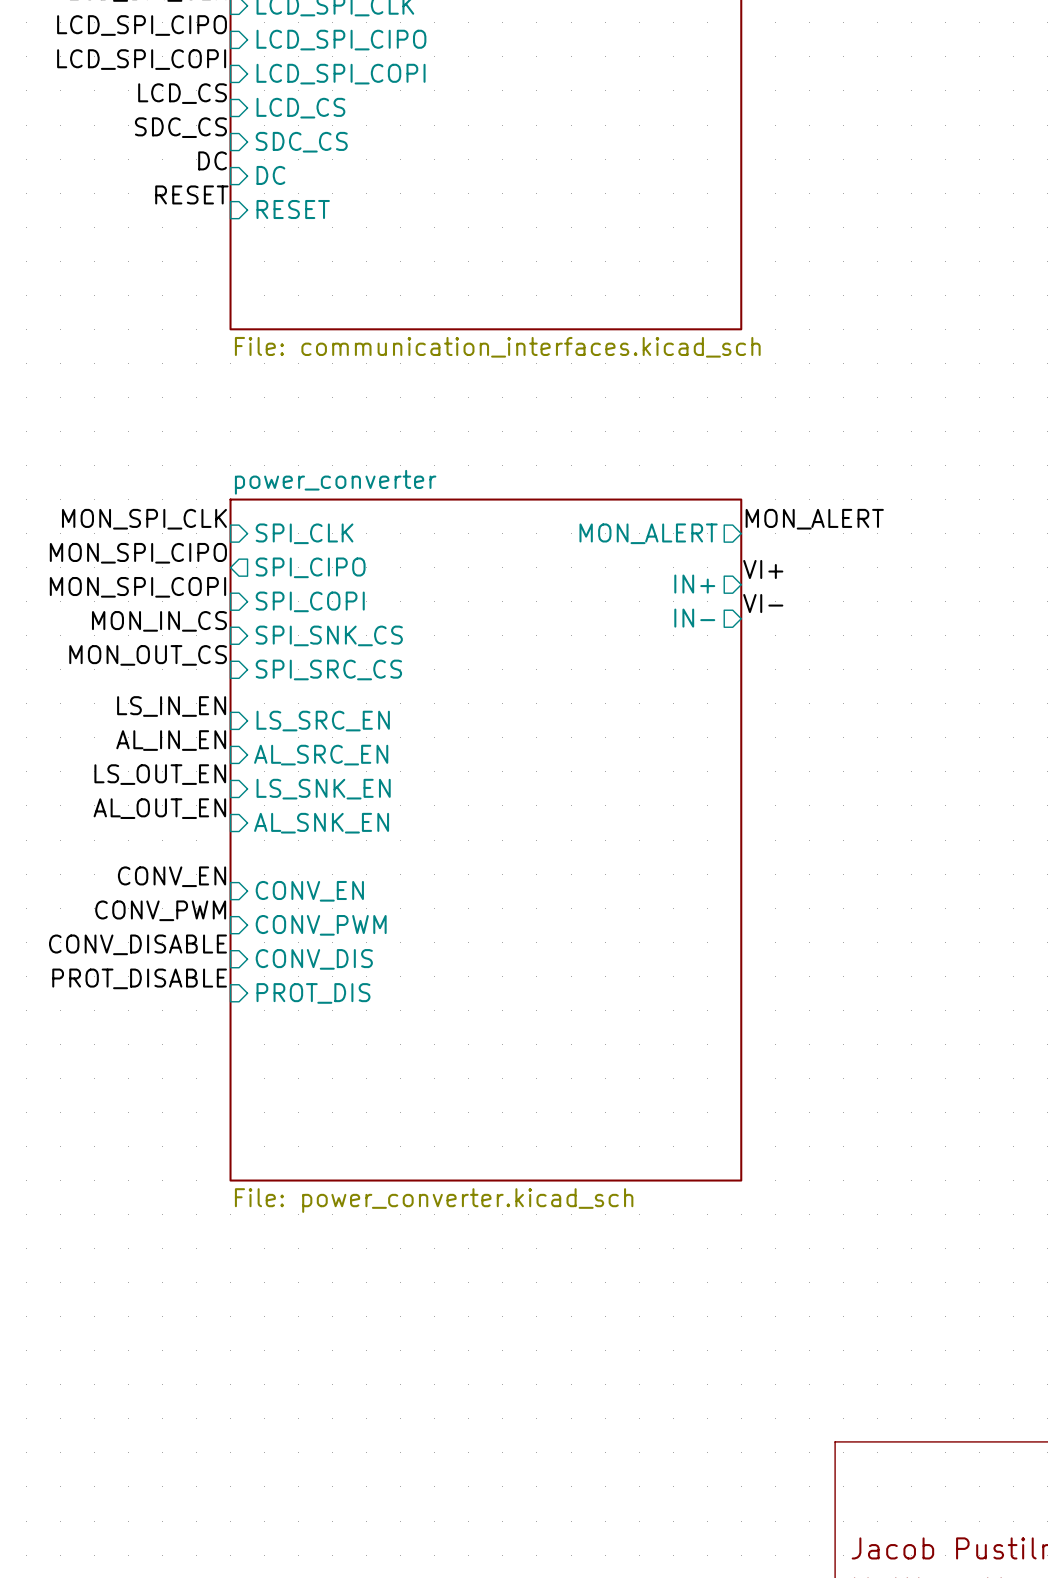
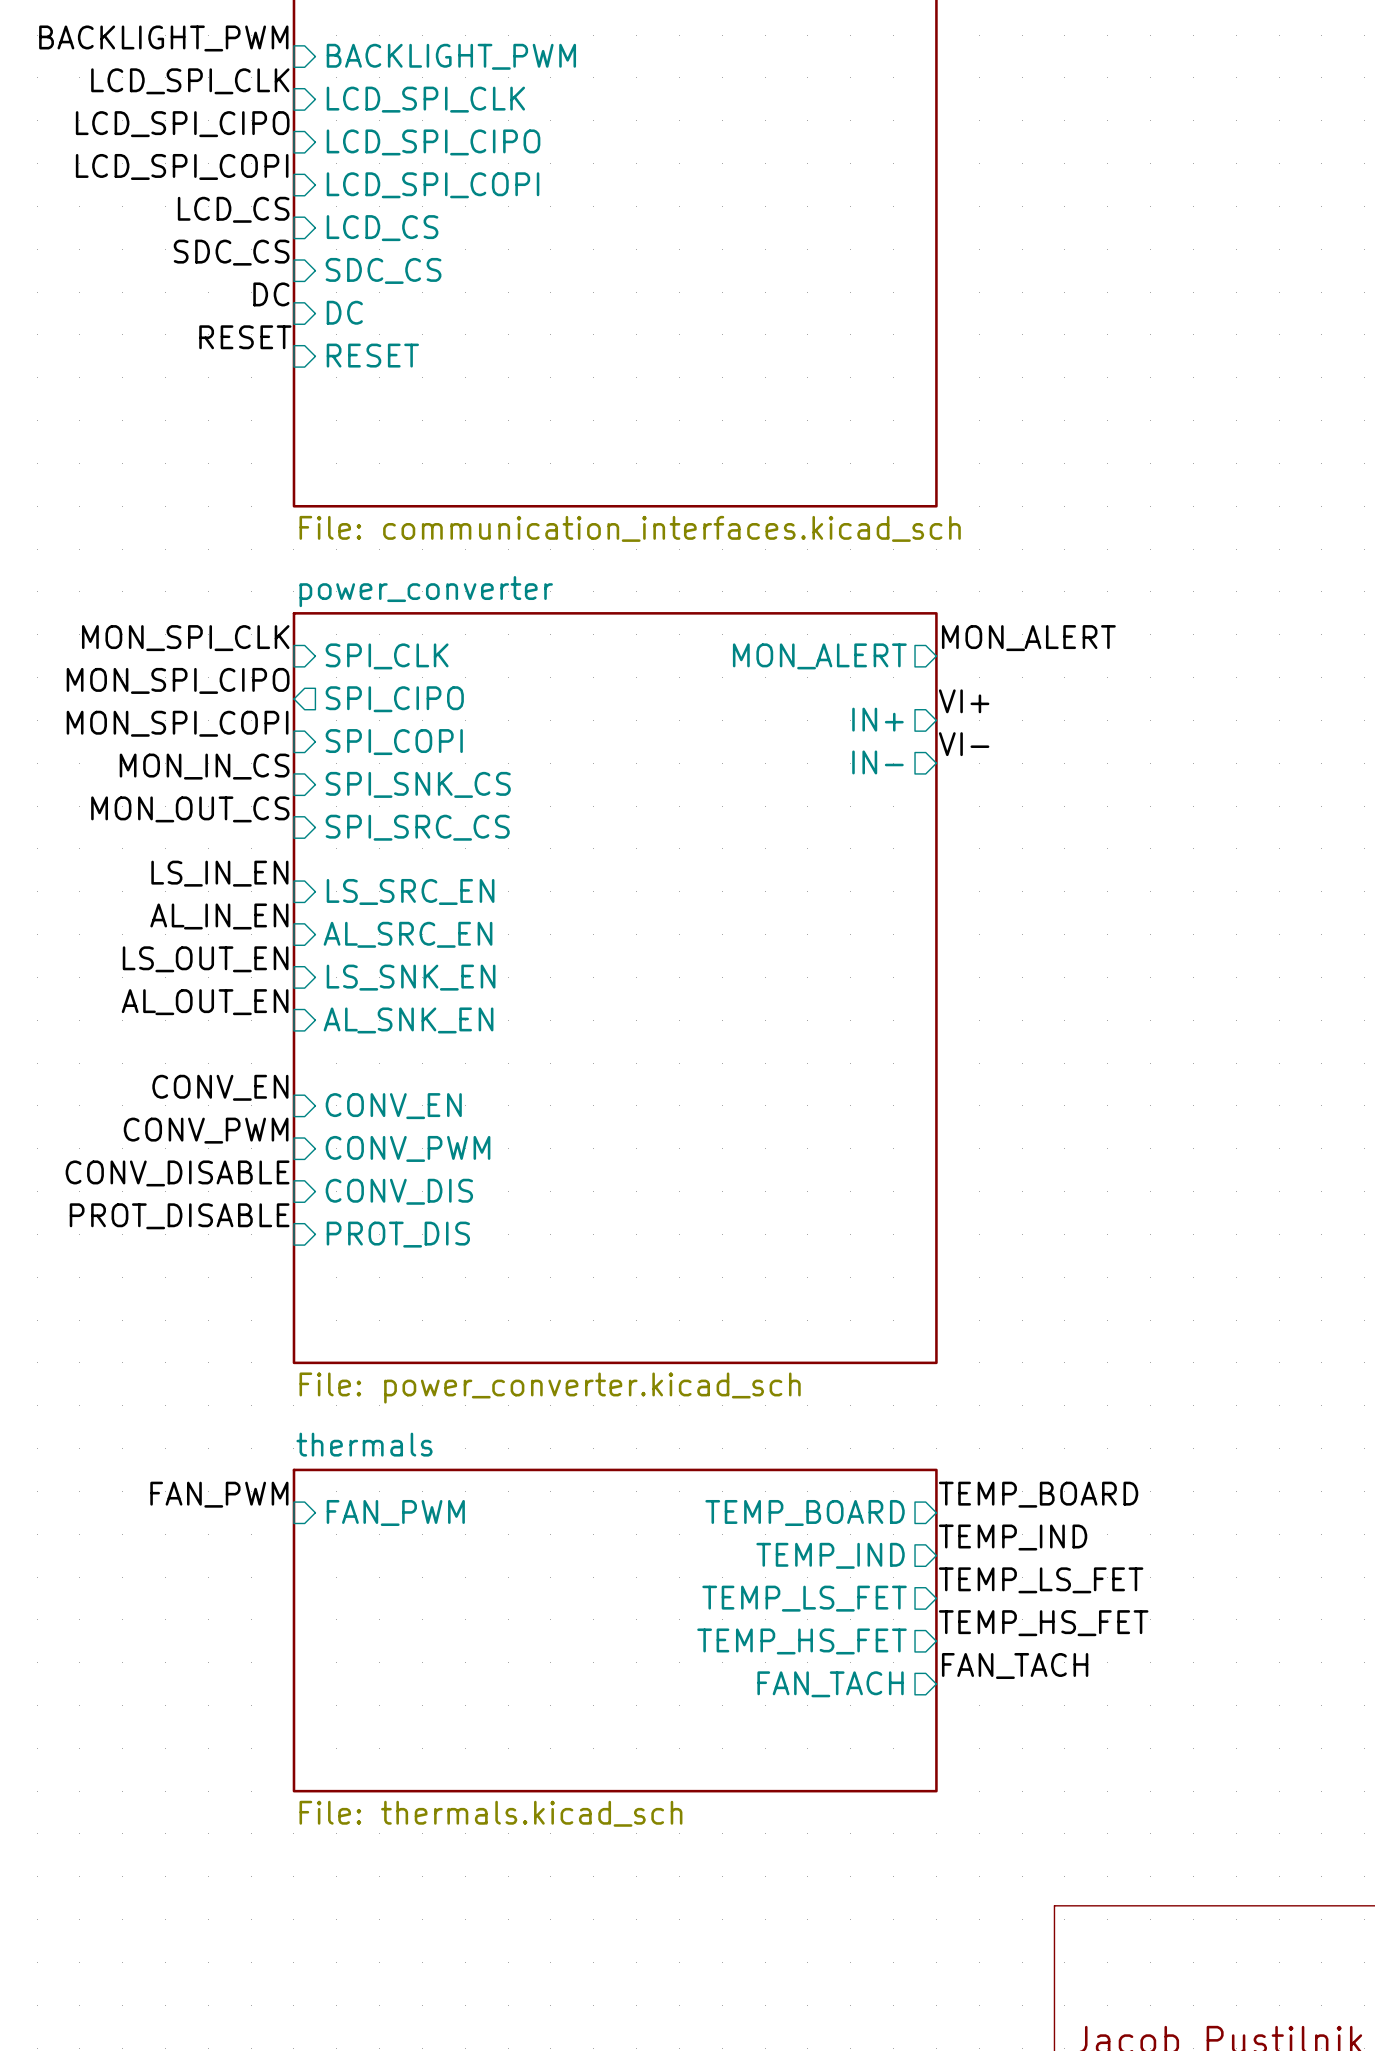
label: none -> MON_ALERT (1028, 638)
sheet pin: none -> MON_ALERT (819, 656)
label position: MON_SPI_CLK (144, 519) -> MON_SPI_CLK (185, 638)
label: MON_ALERT (814, 519) -> VI- (964, 744)
sheet pin position: SPI_CLK (304, 533) -> SPI_CLK (387, 656)
sheet pin: MON_ALERT (648, 533) -> IN- (877, 762)
label: none -> MON_IN_CS (204, 766)
sheet pin: none -> SPI_SNK_CS (418, 784)
label position: MON_SPI_CIPO (138, 553) -> MON_SPI_CIPO (178, 680)
sheet pin position: SPI_CIPO (310, 567) -> SPI_CIPO (394, 699)
label position: VI+ (763, 569) -> VI+ (964, 701)
label: none -> MON_OUT_CS (190, 809)
sheet pin: none -> SPI_SRC_CS (417, 827)
sheet pin position: IN+ (694, 584) -> IN+ (877, 719)
label position: MON_SPI_COPI (137, 587) -> MON_SPI_COPI (177, 723)
sheet pin position: SPI_COPI (310, 601) -> SPI_COPI (394, 742)
label: VI- (763, 603) -> none
sheet pin: IN- (694, 618) -> none
label: MON_IN_CS (159, 621) -> LS_IN_EN (219, 873)
sheet pin: SPI_SNK_CS (329, 635) -> LS_SRC_EN (410, 891)
label: MON_OUT_CS (148, 655) -> AL_IN_EN (219, 916)
sheet pin: SPI_SRC_CS (328, 669) -> AL_SRC_EN (408, 934)
label: LS_IN_EN (171, 706) -> none
sheet power_converter: none -> File: power_converter.kicad_sch (615, 988)
sheet pin: LS_SRC_EN (323, 721) -> none
label: AL_IN_EN (171, 740) -> none
sheet pin: AL_SRC_EN (321, 755) -> none
label position: LS_OUT_EN (160, 774) -> LS_OUT_EN (205, 959)
sheet pin position: LS_SNK_EN (323, 789) -> LS_SNK_EN (411, 977)
label position: AL_OUT_EN (159, 808) -> AL_OUT_EN (205, 1002)
sheet pin position: AL_SNK_EN (321, 823) -> AL_SNK_EN (408, 1020)
sheet power_converter: File: power_converter.kicad_sch (485, 840) -> none
label position: CONV_EN (172, 876) -> CONV_EN (220, 1087)
sheet pin position: CONV_EN (309, 891) -> CONV_EN (393, 1106)
label position: CONV_PWM (160, 910) -> CONV_PWM (206, 1130)
sheet pin position: CONV_PWM (321, 925) -> CONV_PWM (408, 1148)
label position: CONV_DISABLE (137, 944) -> CONV_DISABLE (177, 1173)
sheet pin position: CONV_DIS (314, 959) -> CONV_DIS (399, 1191)
label position: PROT_DISABLE (139, 978) -> PROT_DISABLE (179, 1216)
sheet pin position: PROT_DIS (313, 993) -> PROT_DIS (398, 1234)
label: none -> FAN_PWM (219, 1494)
label: none -> TEMP_BOARD (1038, 1494)
sheet pin: none -> FAN_PWM (395, 1512)
sheet pin: none -> TEMP_BOARD (805, 1512)
label: none -> TEMP_IND (1013, 1537)
sheet pin: none -> TEMP_IND (830, 1555)
label: none -> TEMP_LS_FET (1041, 1580)
sheet pin: none -> TEMP_LS_FET (804, 1598)
label: none -> TEMP_HS_FET (1043, 1623)
sheet thermals: none -> File: thermals.kicad_sch (615, 1630)
sheet pin: none -> TEMP_HS_FET (802, 1641)
label: none -> FAN_TACH (1015, 1665)
sheet pin: none -> FAN_TACH (830, 1684)

